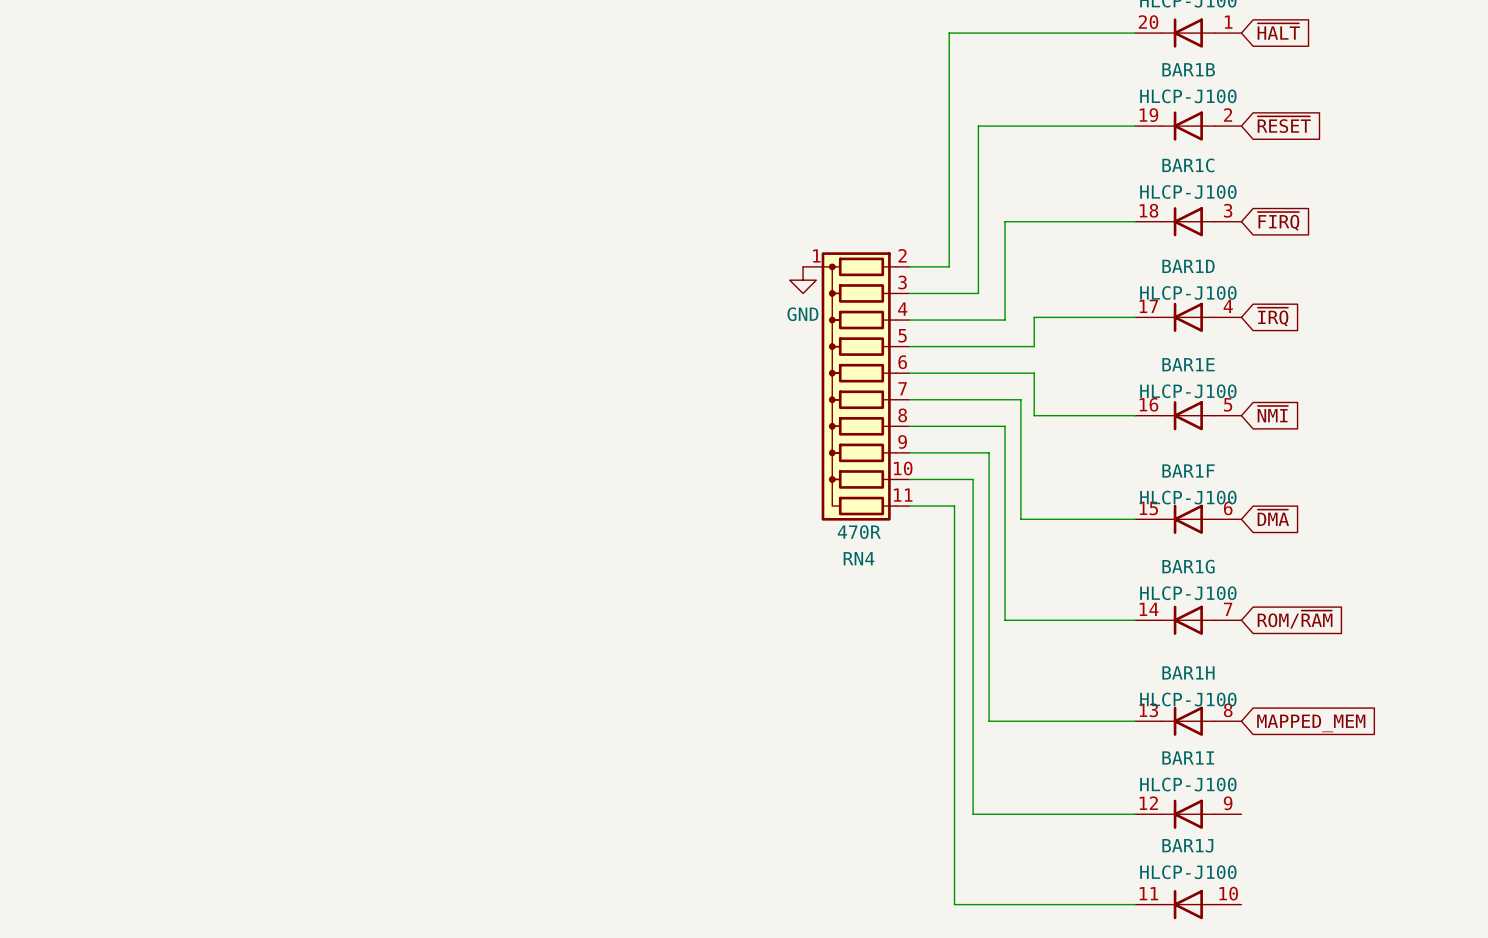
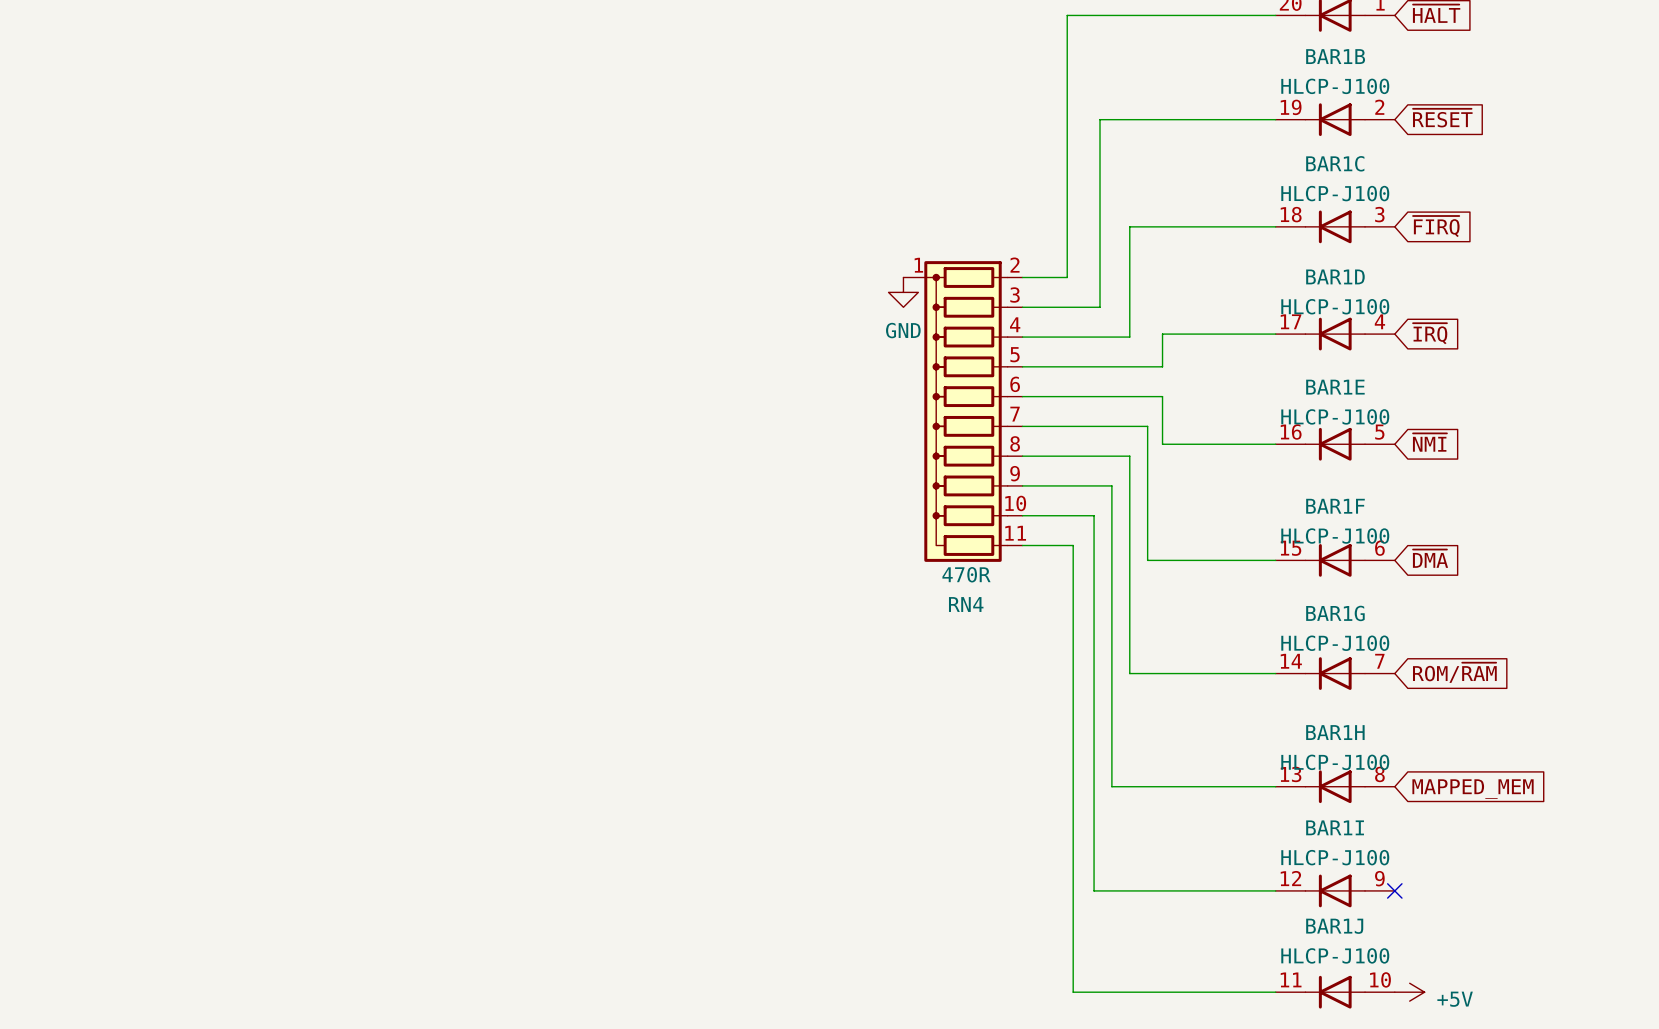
no-connect mark: none -> (1394, 890)
power symbol: none -> +5V (1409, 992)

